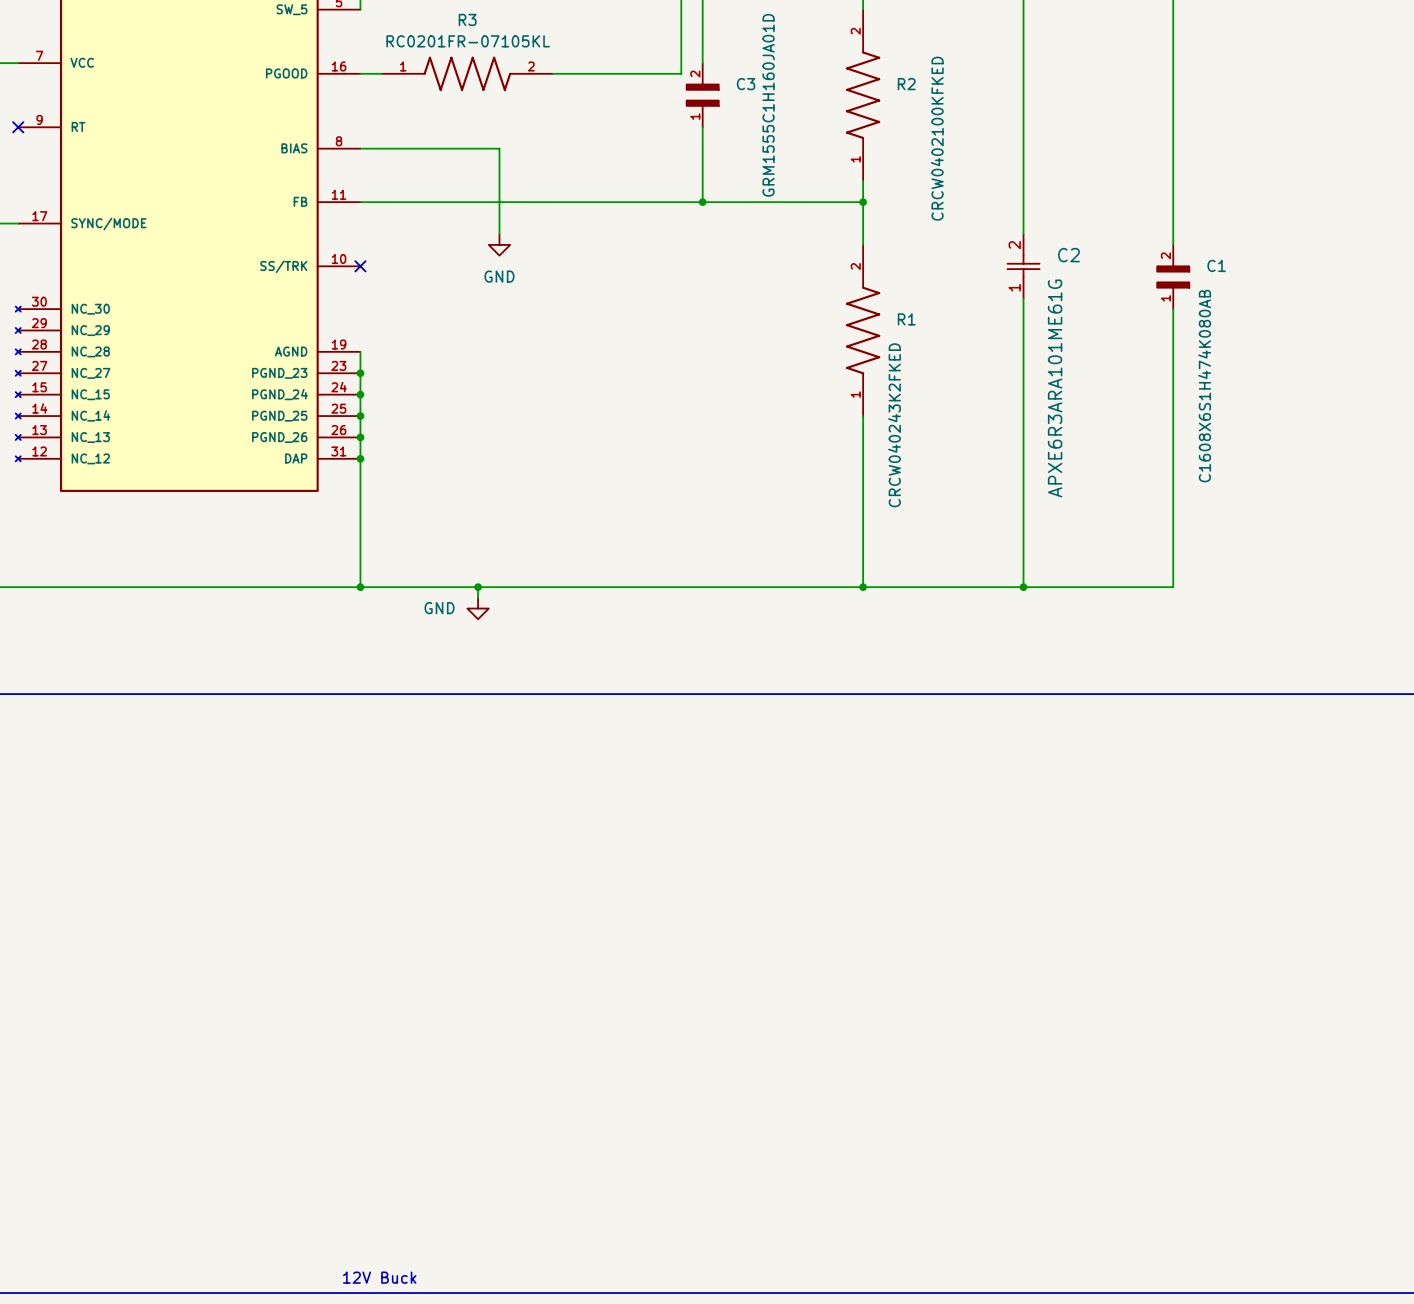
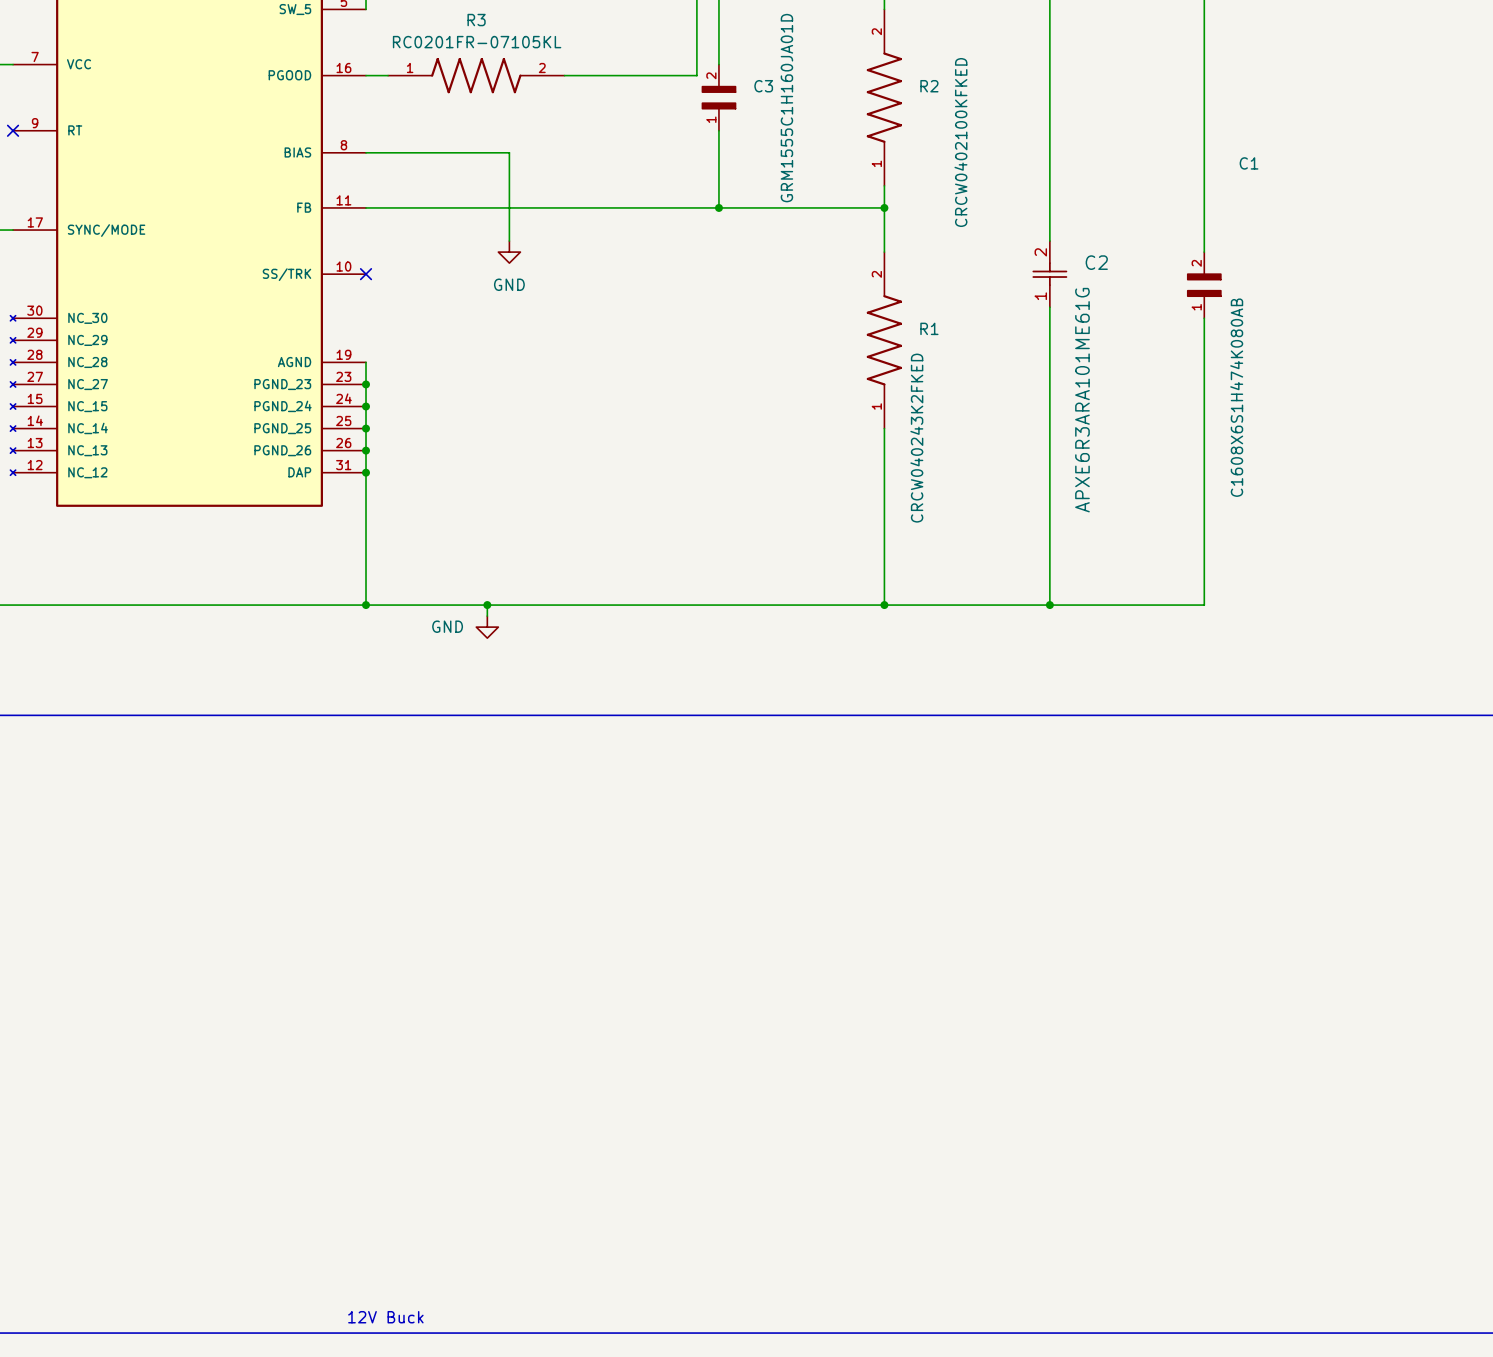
C1 name position: C1 (1216, 265) -> C1 (1249, 163)

